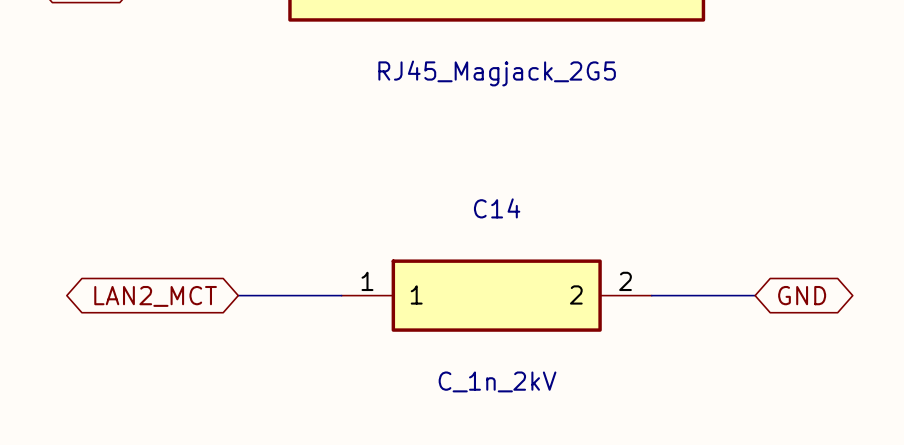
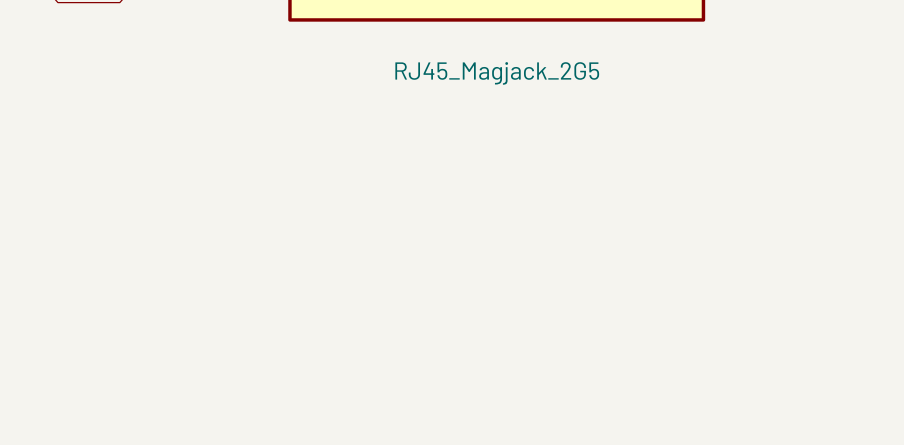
wire: (238, 295) (341, 295) -> none
C14: C_1n_2kV (496, 295) -> none
wire: (651, 295) (755, 295) -> none
global label: GND (802, 295) -> none
global label: LAN2_MCT (155, 296) -> none

